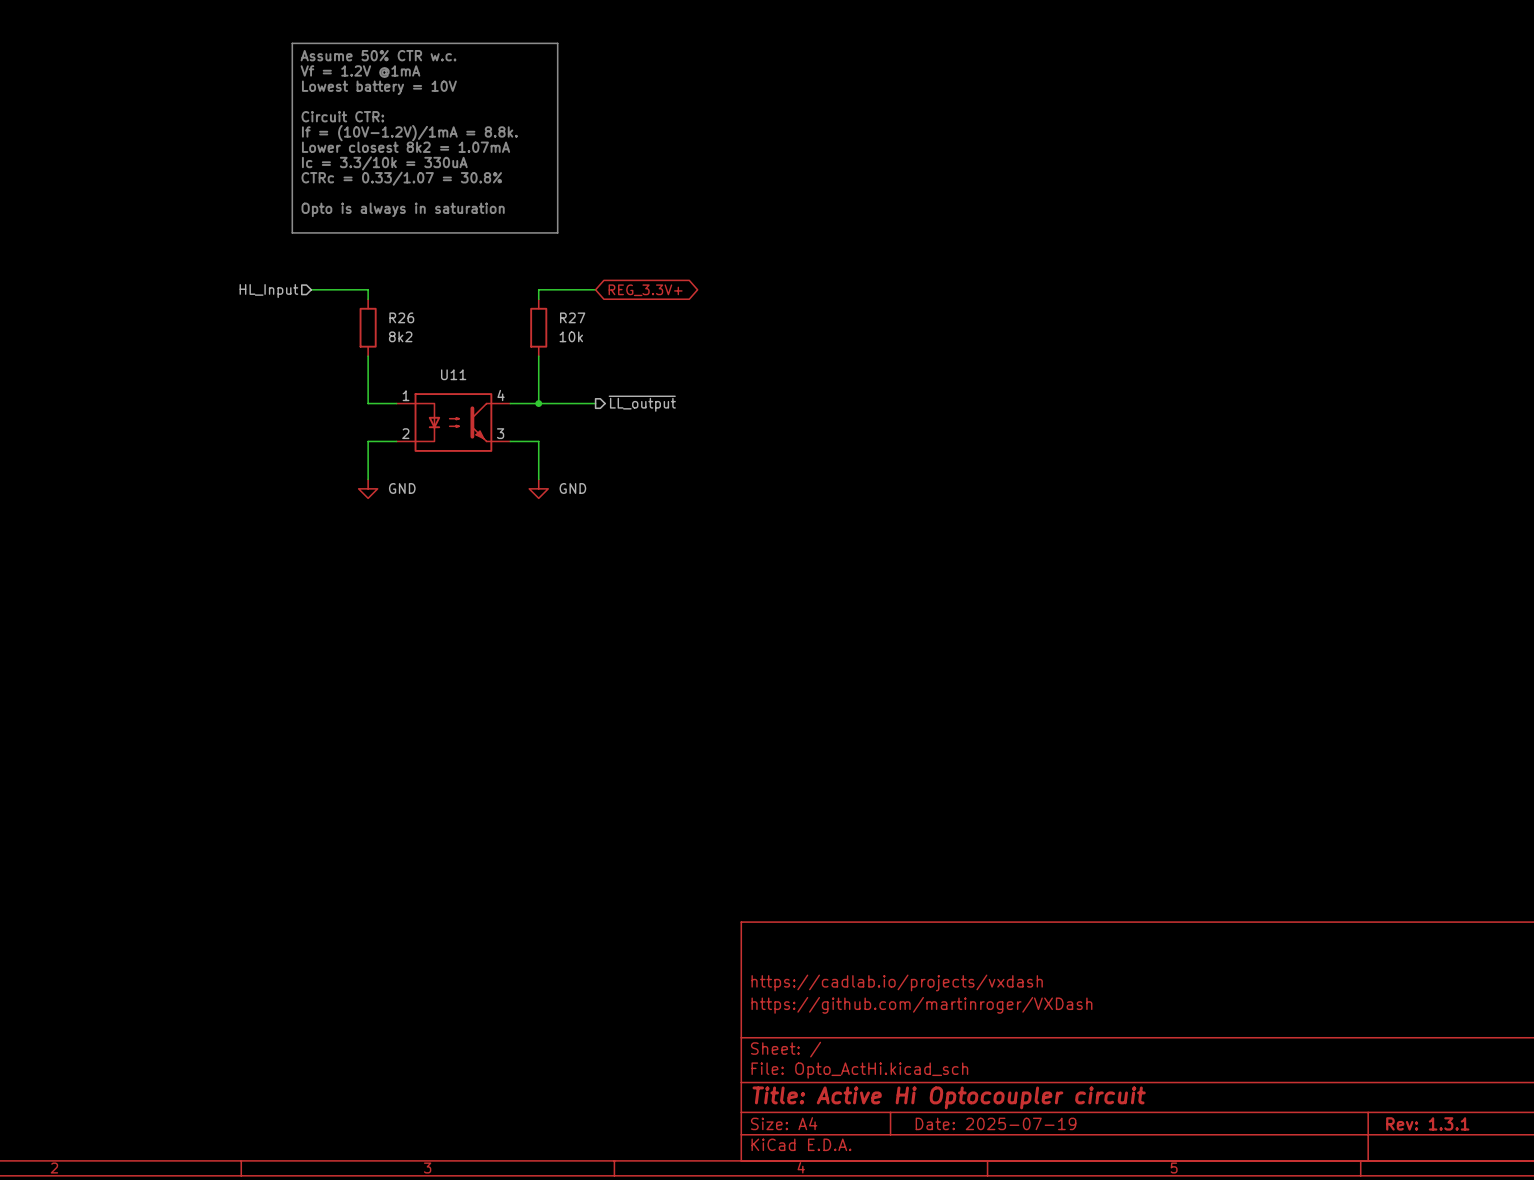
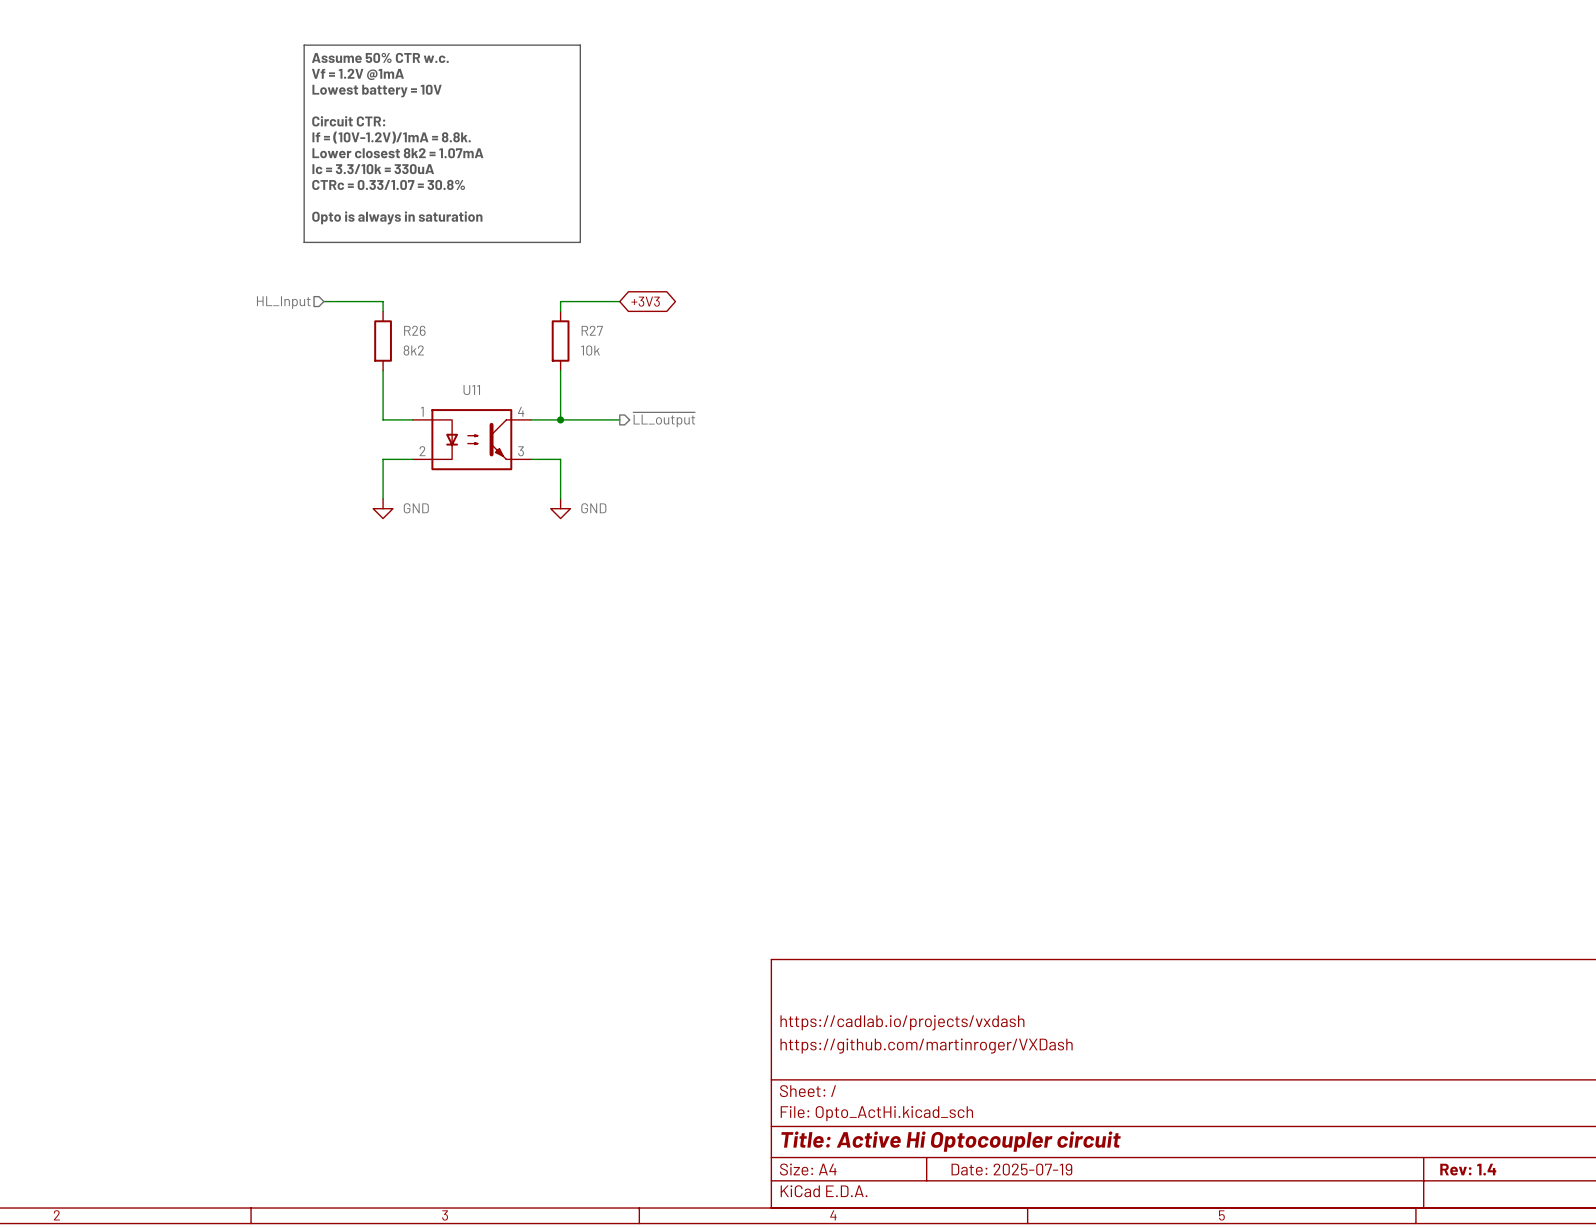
global label: REG_3.3V+ (645, 290) -> +3V3 (645, 301)
title block: Rev: 1.3.1 (1427, 1123) -> Rev: 1.4 (1468, 1169)

